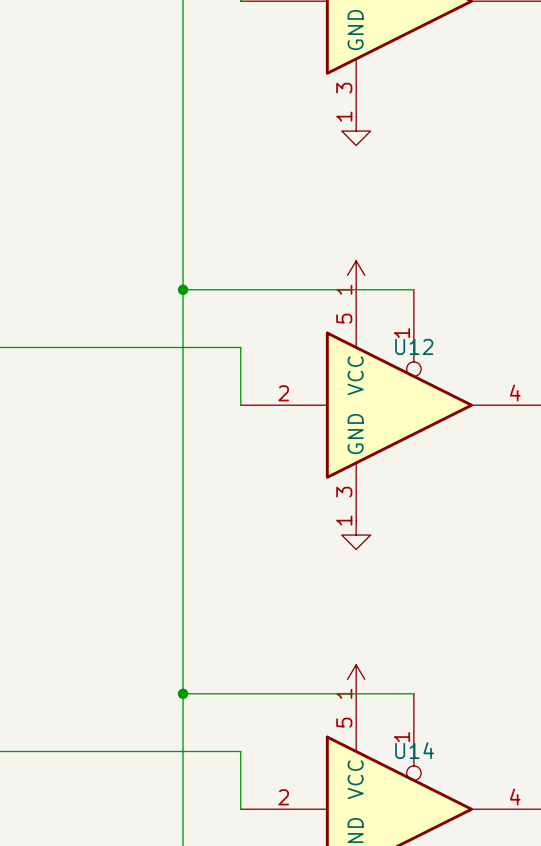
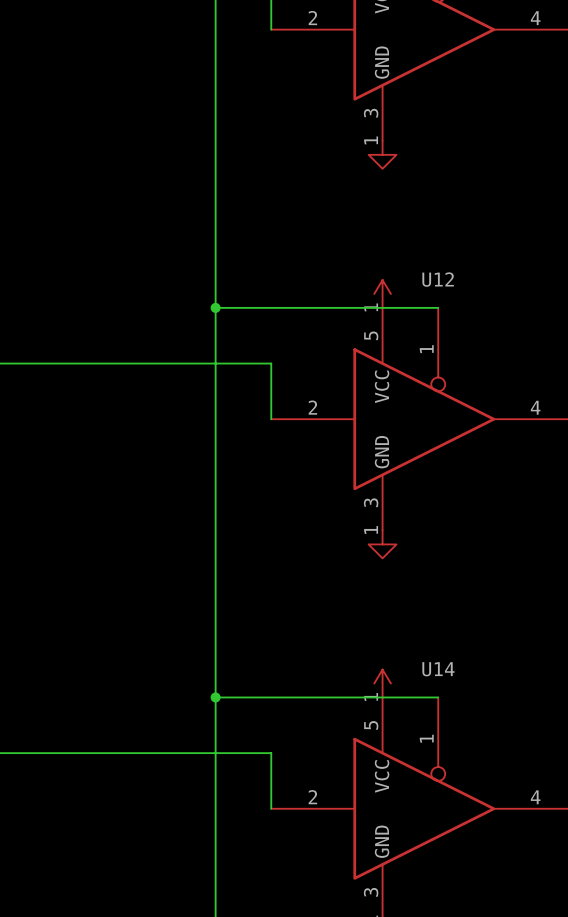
U12 name position: U12 (414, 346) -> U12 (438, 279)
U14 name position: U14 (414, 750) -> U14 (438, 669)

